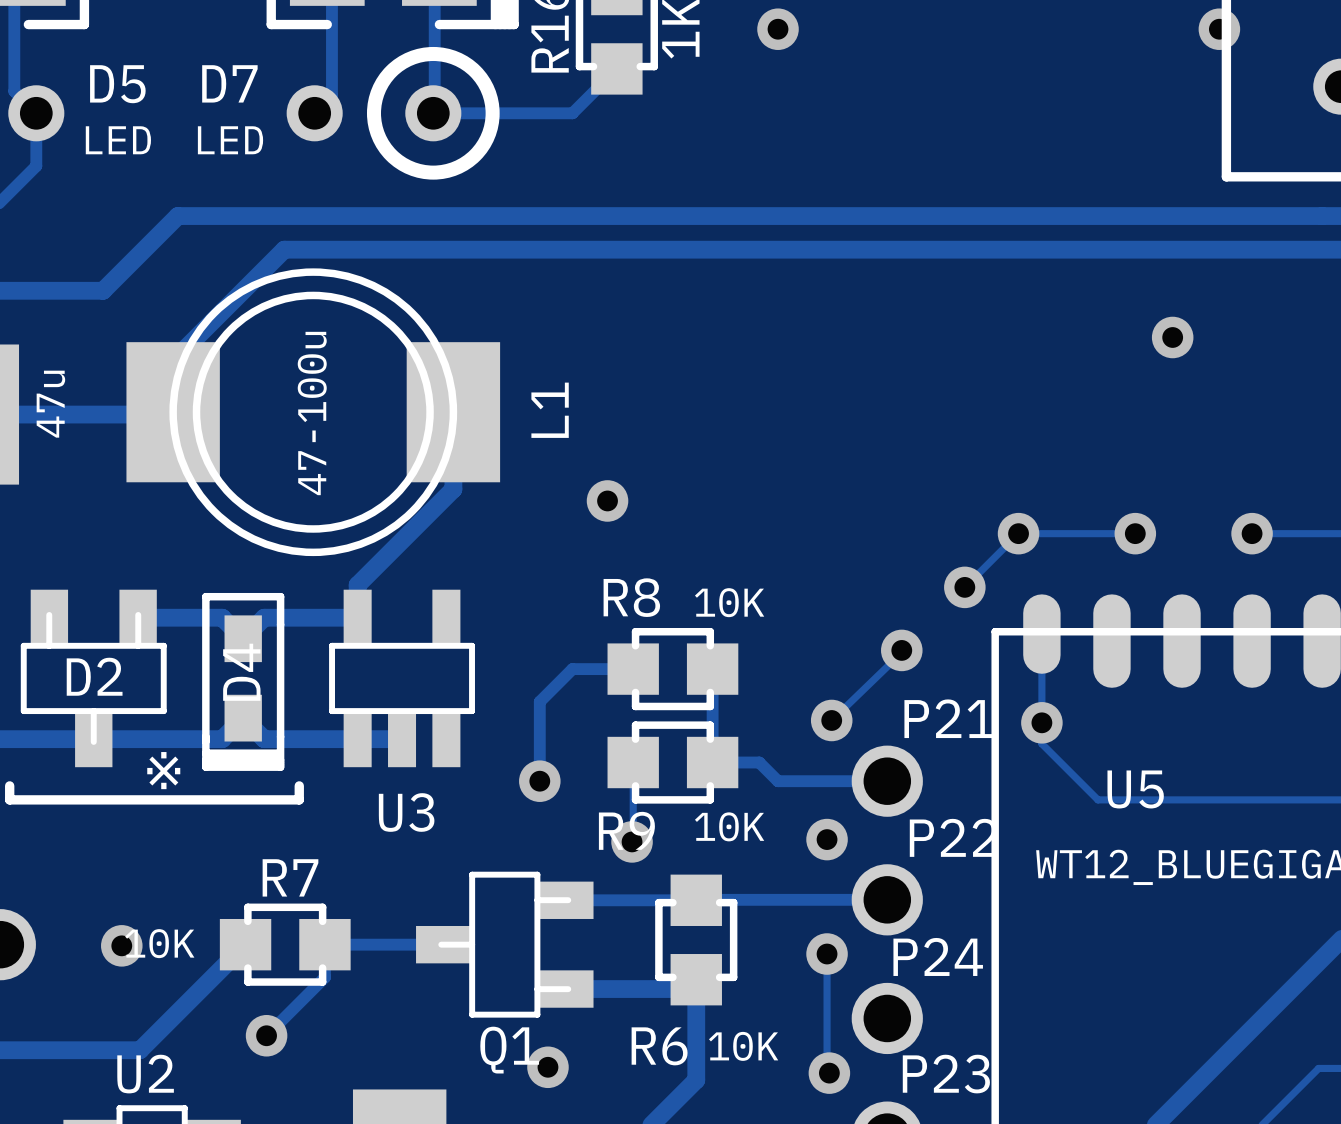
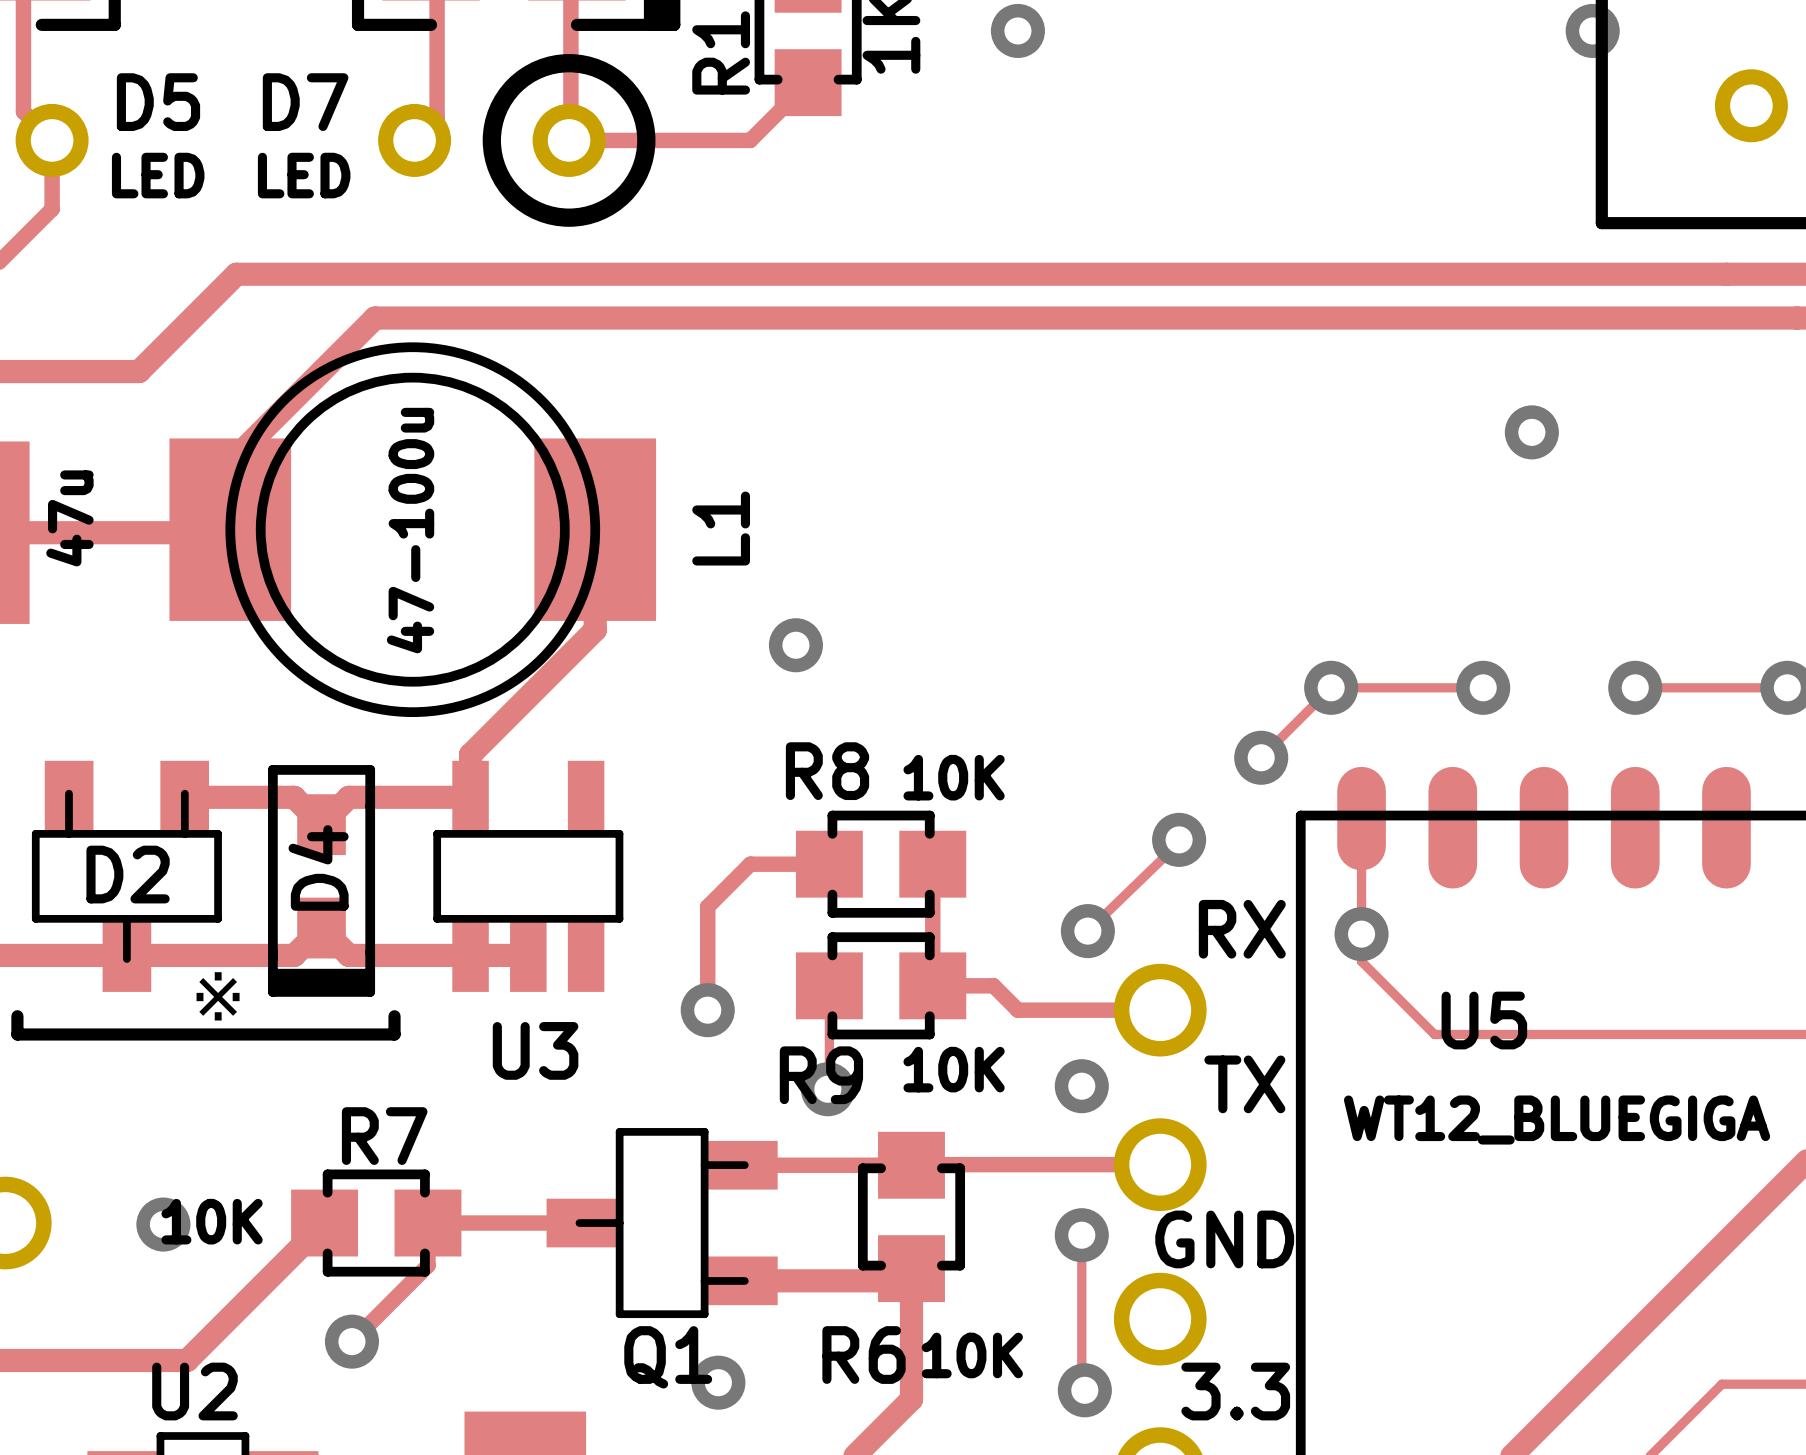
P21 name: P21 (949, 718) -> RX (1242, 929)
P22 name: P22 (953, 837) -> TX (1244, 1084)
P24 name: P24 (938, 956) -> GND (1224, 1239)
P23 name: P23 (946, 1074) -> 3.3 (1235, 1391)

